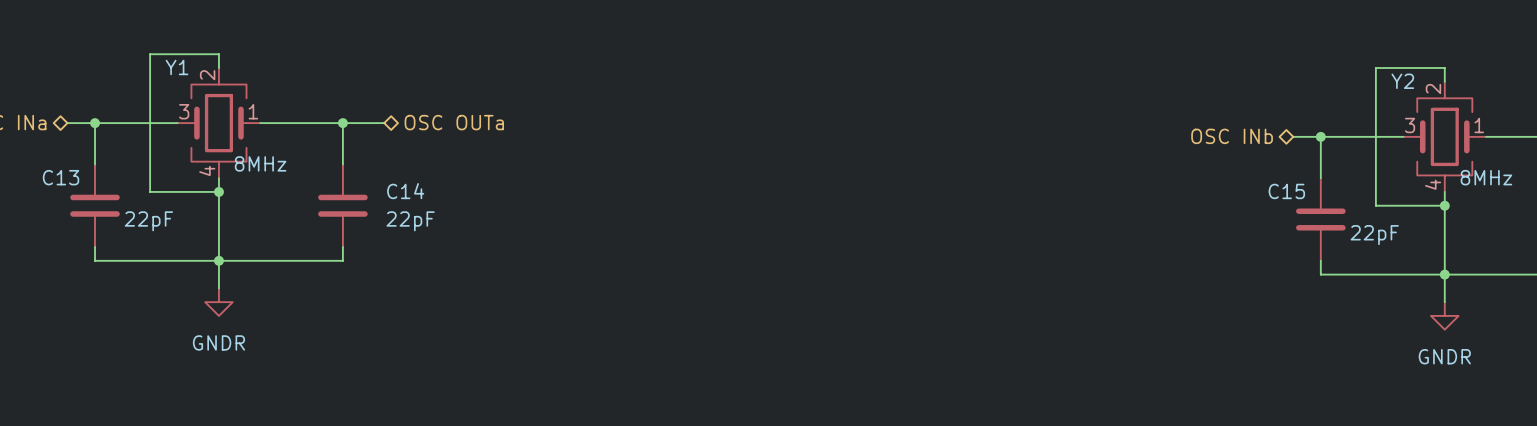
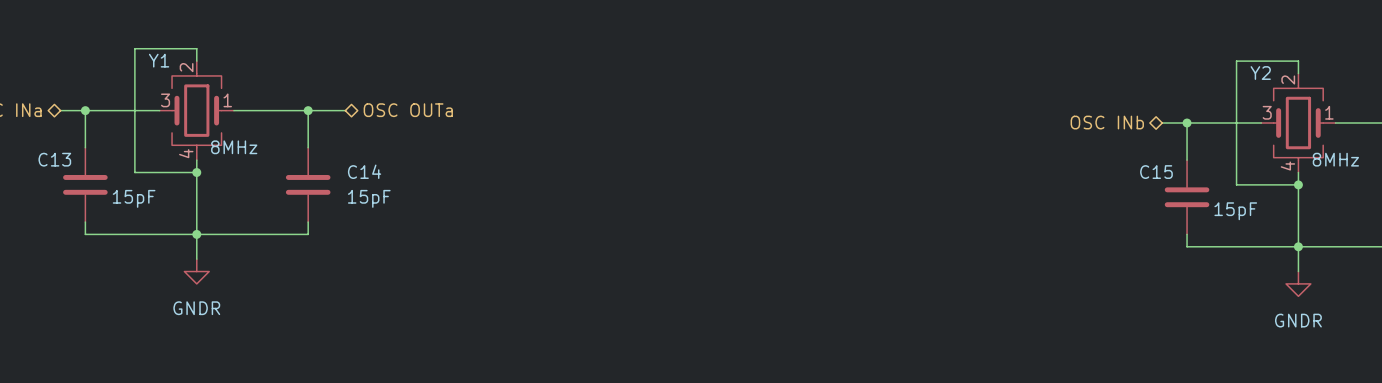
C13 value: 22pF (148, 221) -> 15pF (134, 198)
C14 value: 22pF (410, 221) -> 15pF (369, 198)
C15 value: 22pF (1374, 235) -> 15pF (1235, 211)

